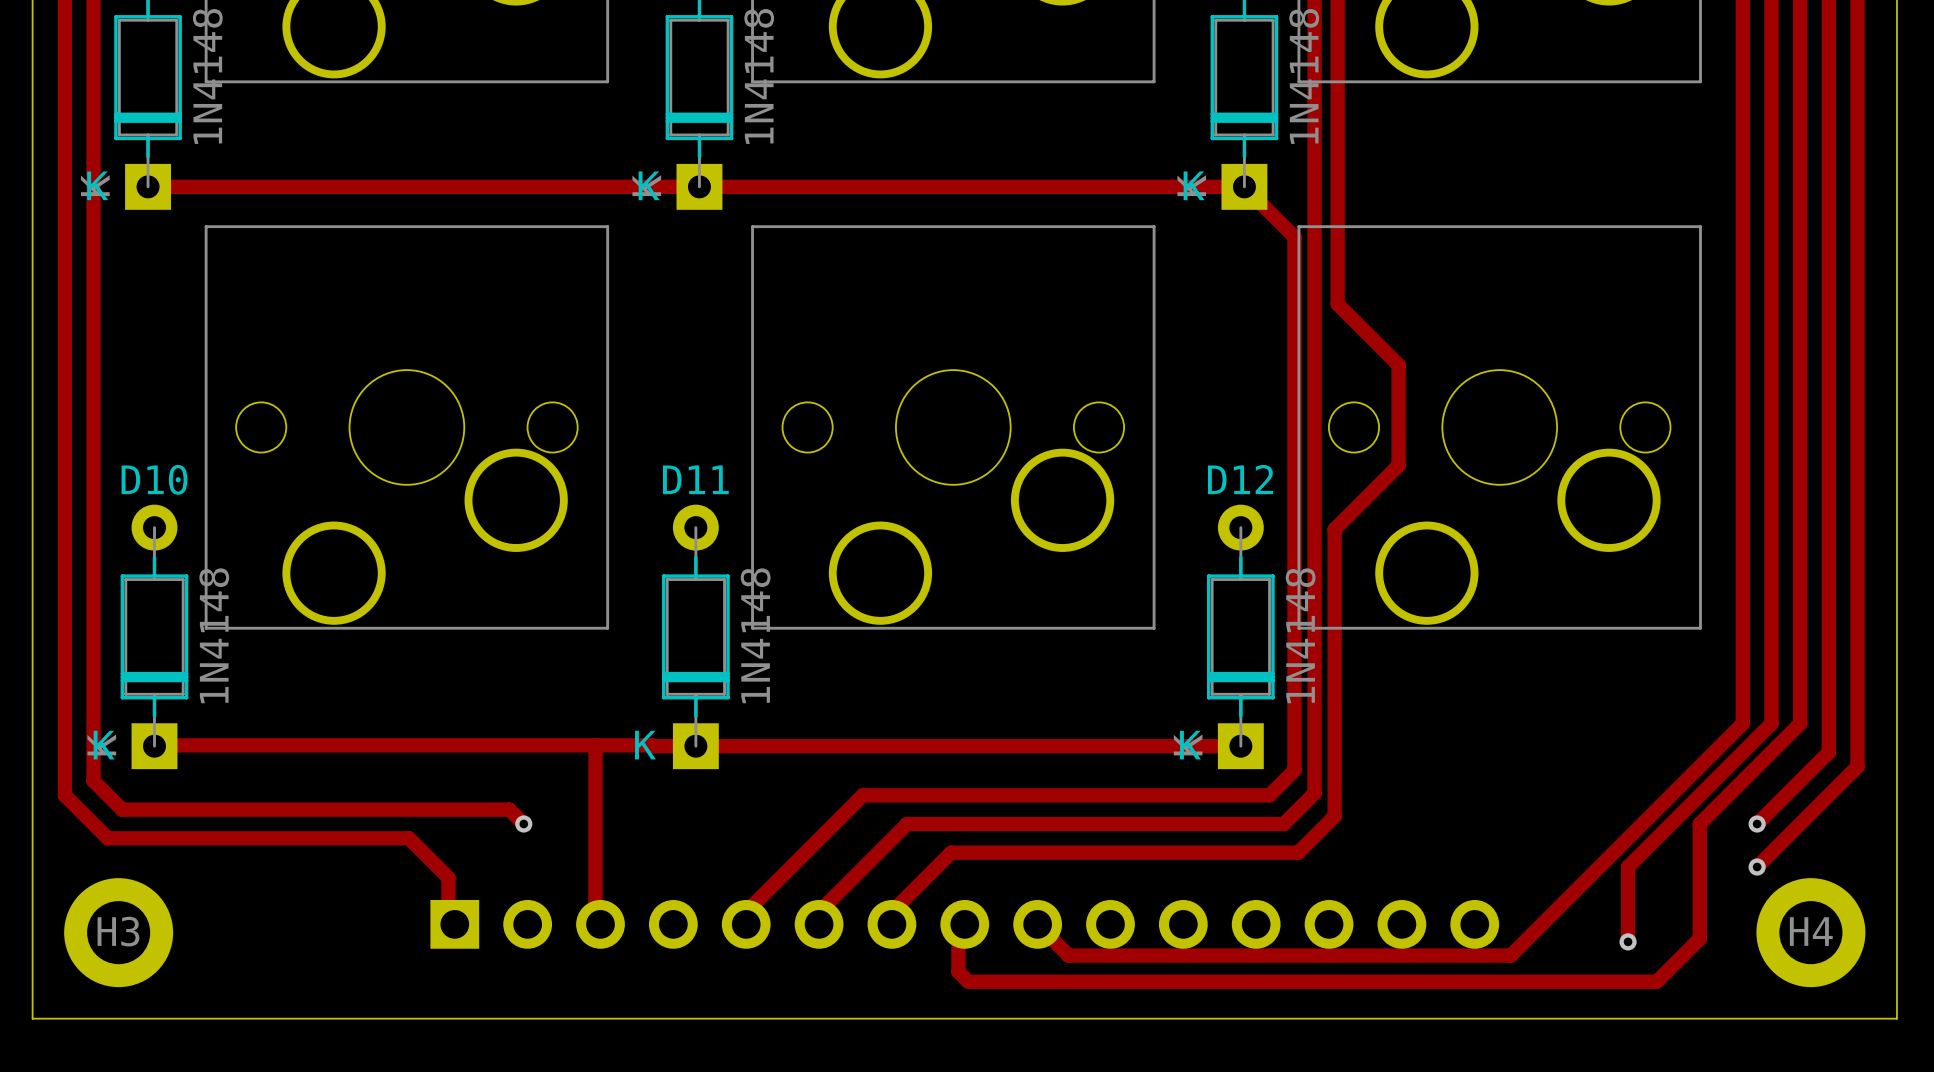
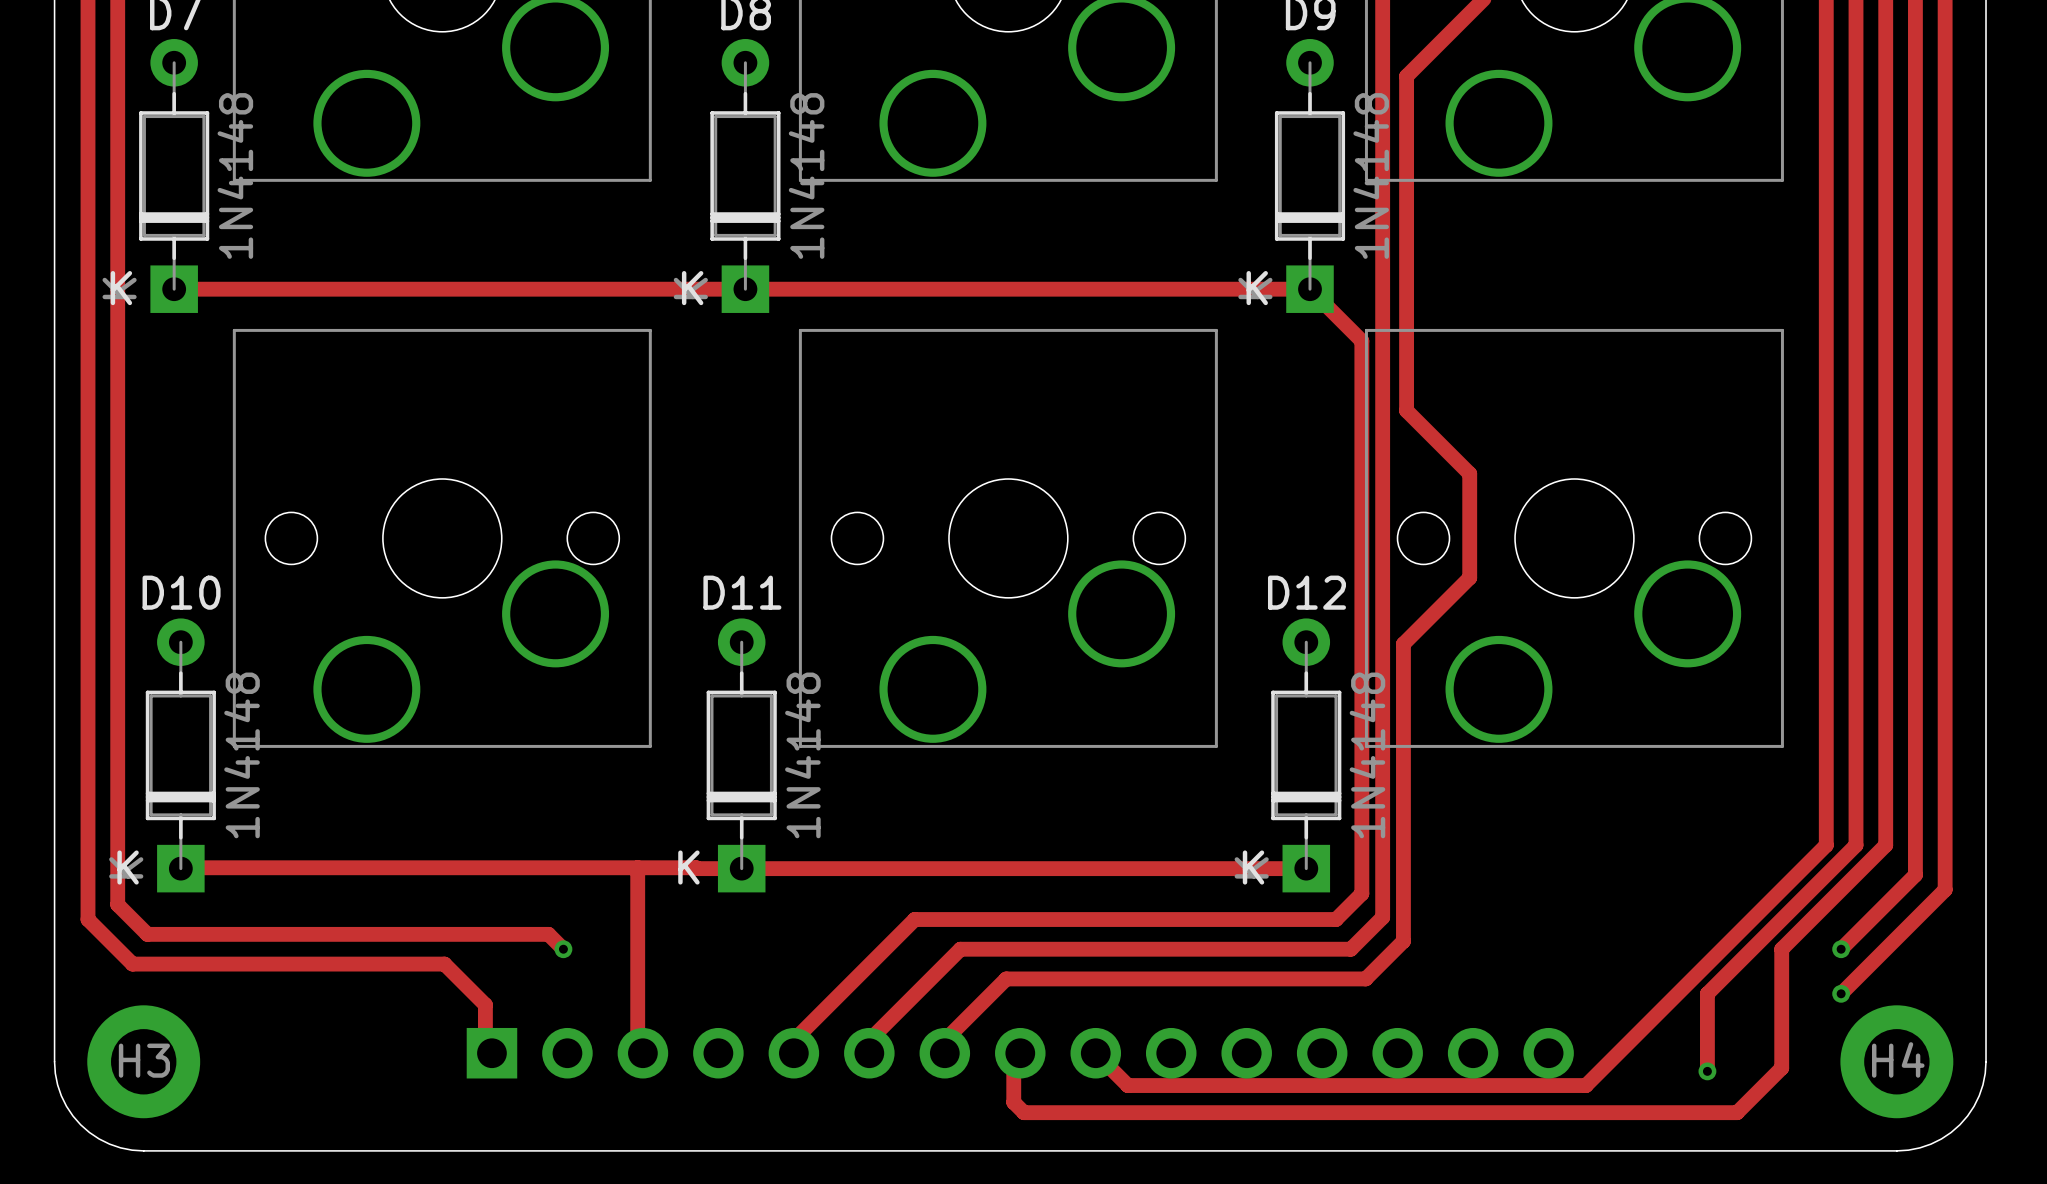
board edge: (32, 932) (32, 1018) (118, 1018) -> (54, 1061) (57, 1084) (61, 1095) (72, 1116) (80, 1124) (89, 1132) (109, 1144) (120, 1147) (143, 1150)
board edge: (1896, 932) (1896, 1018) (1810, 1018) -> (1986, 1061) (1982, 1084) (1979, 1095) (1974, 1106) (1959, 1124) (1951, 1132) (1930, 1144) (1919, 1147) (1896, 1150)

